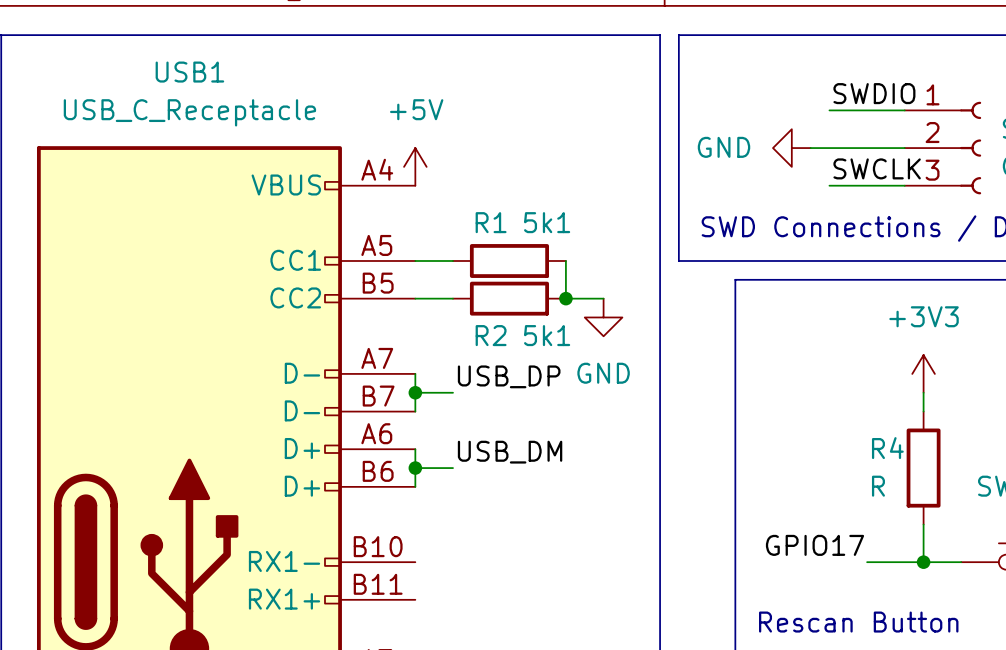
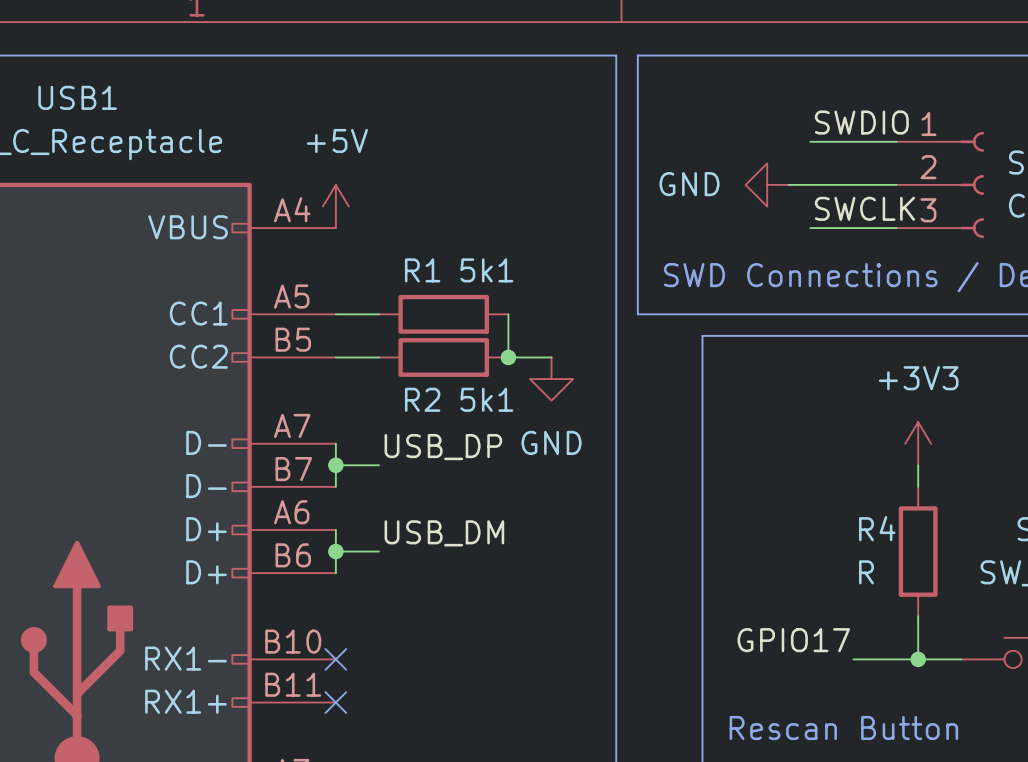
no-connect mark: none -> (335, 659)
no-connect mark: none -> (335, 702)

